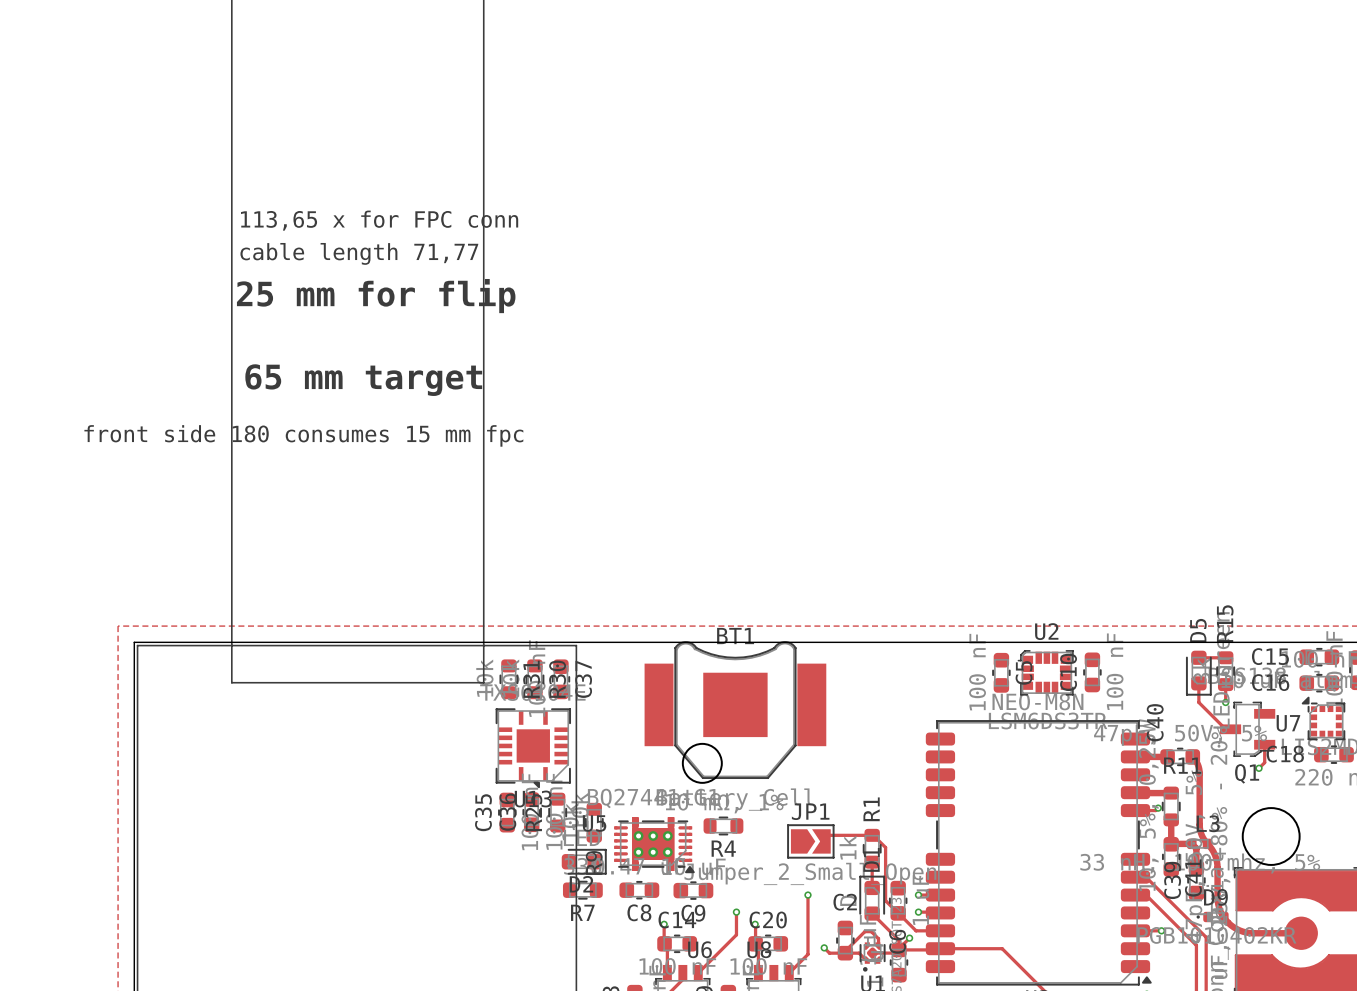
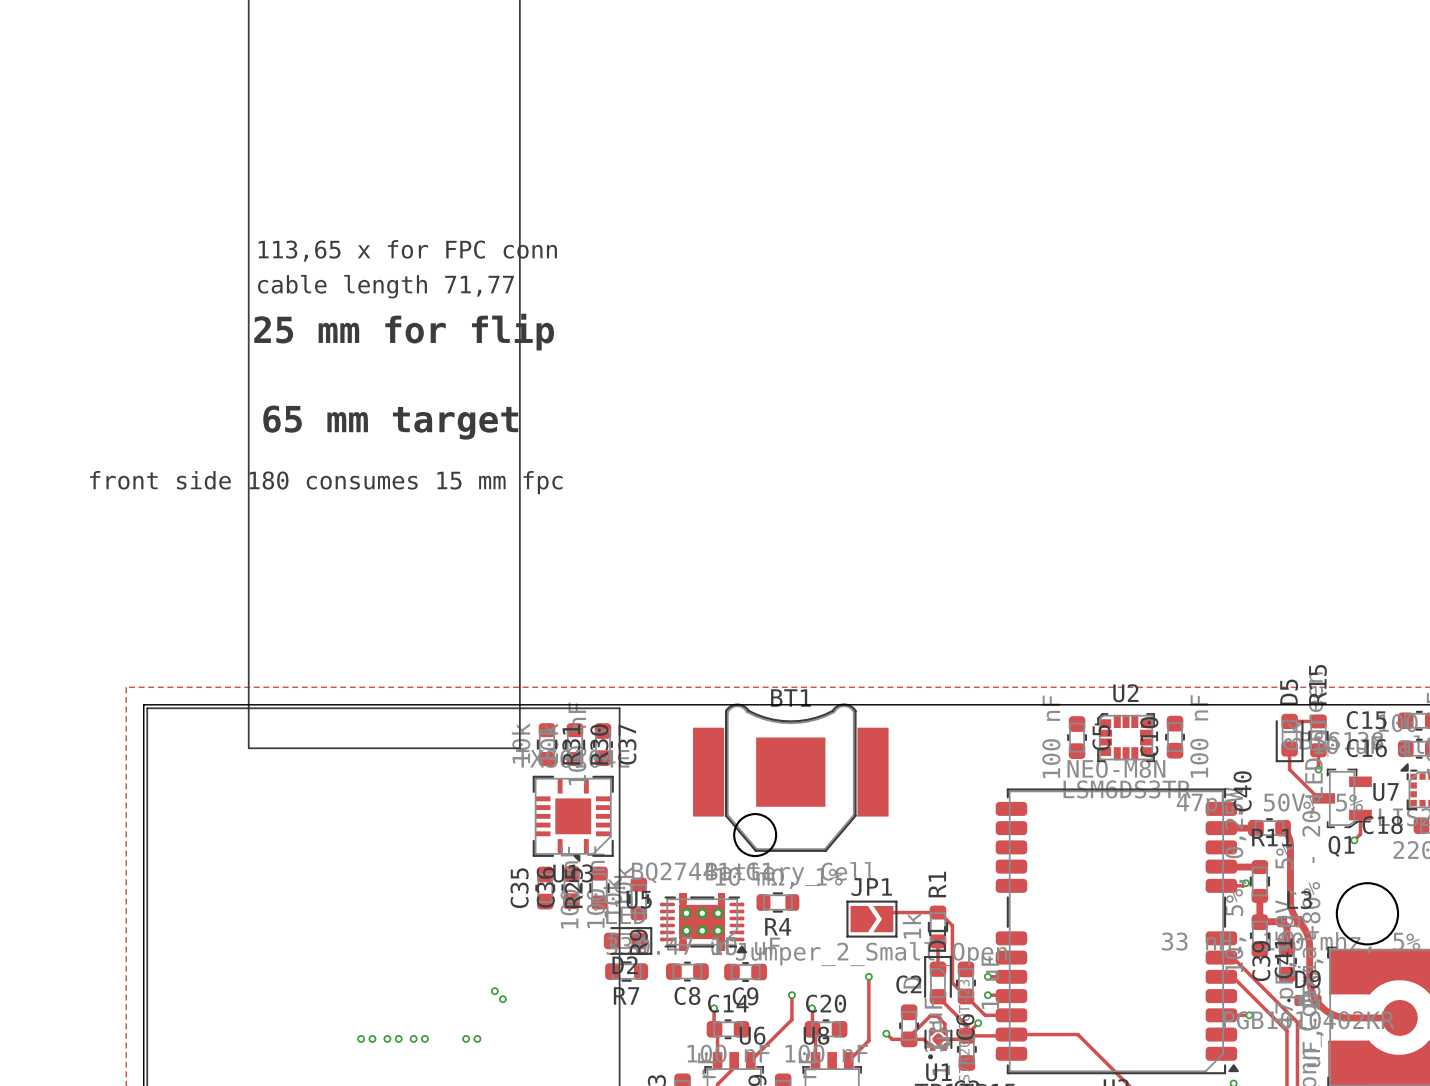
via: none -> (494, 991)
via: none -> (502, 999)
via: none -> (361, 1038)
via: none -> (372, 1038)
via: none -> (387, 1038)
via: none -> (398, 1038)
via: none -> (413, 1038)
via: none -> (424, 1038)
via: none -> (466, 1038)
via: none -> (477, 1038)

